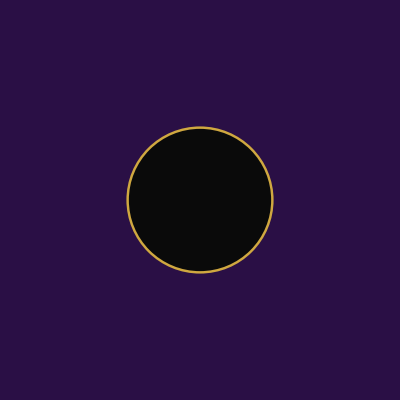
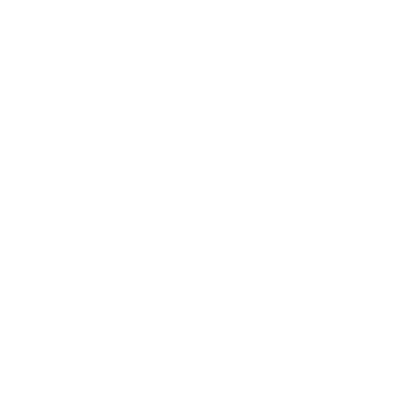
via: (199, 199) -> none

